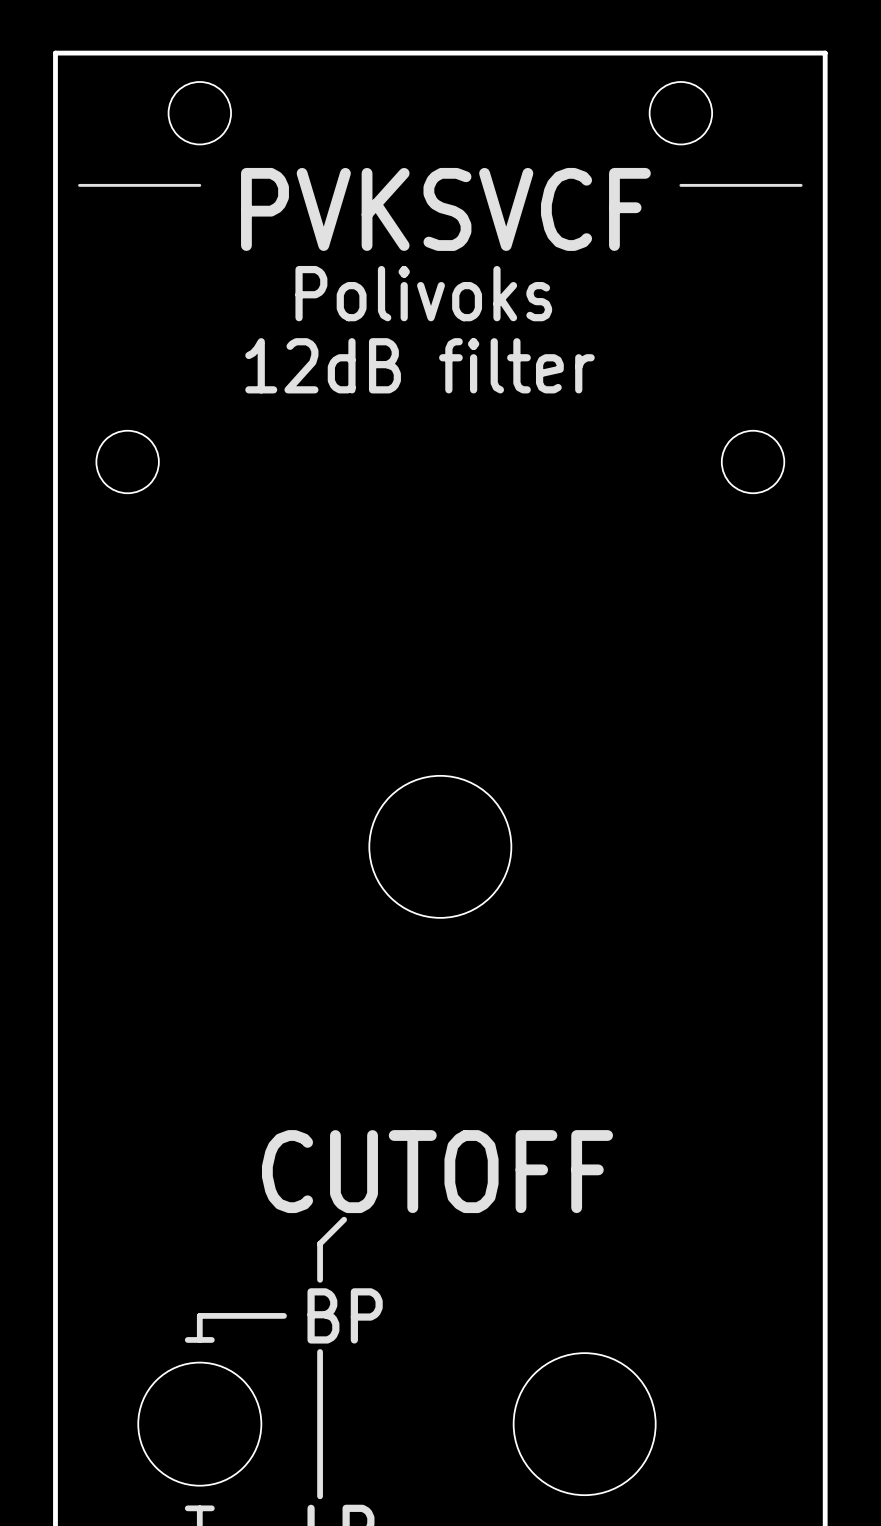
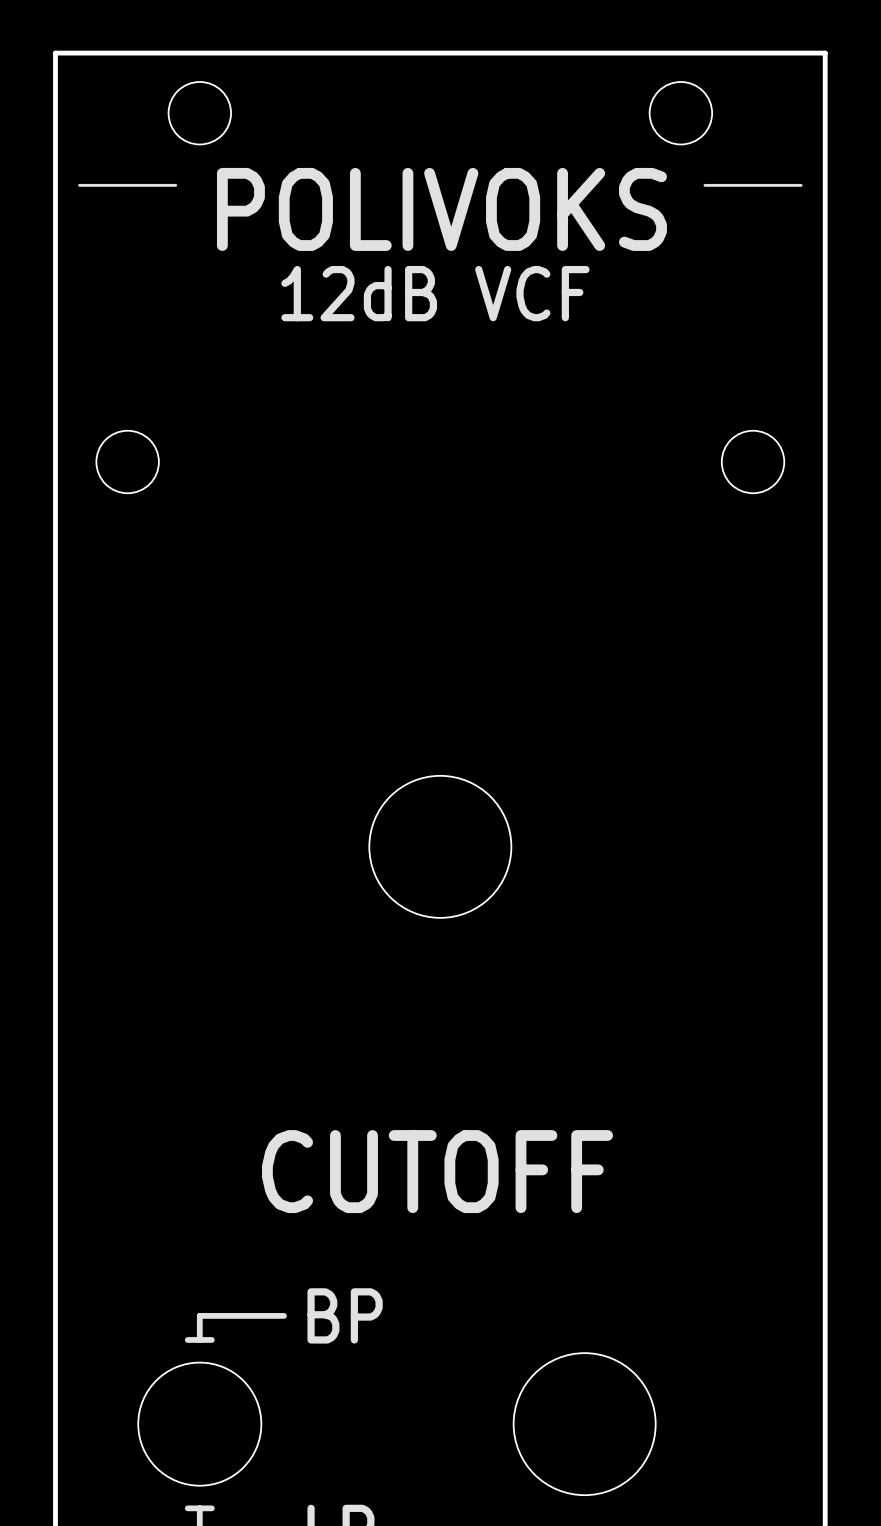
line: (175, 185) (199, 185) -> none
line: (680, 185) (704, 185) -> none
text: none -> POLIVOKS (441, 209)
text: PVKSVCF (445, 209) -> none
text: Polivoks (423, 293) -> 12dB VCF (435, 293)
text: 12dB filter (420, 365) -> none
line: (344, 1219) (320, 1243) (320, 1279) -> none
line: (320, 1351) (320, 1496) -> none

